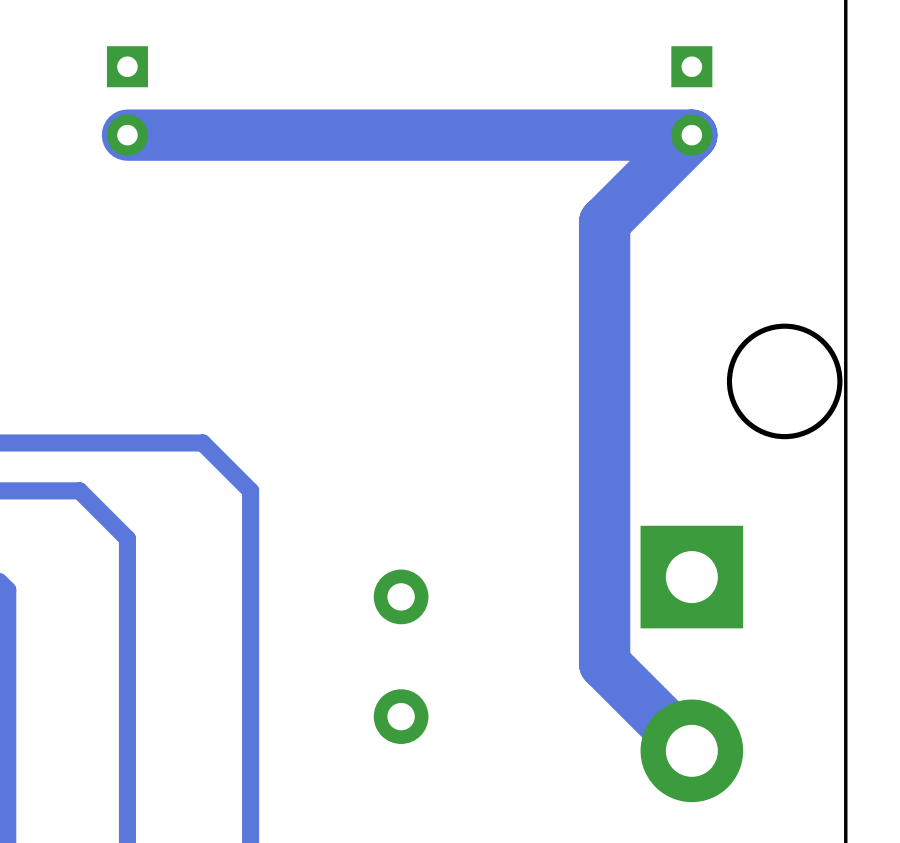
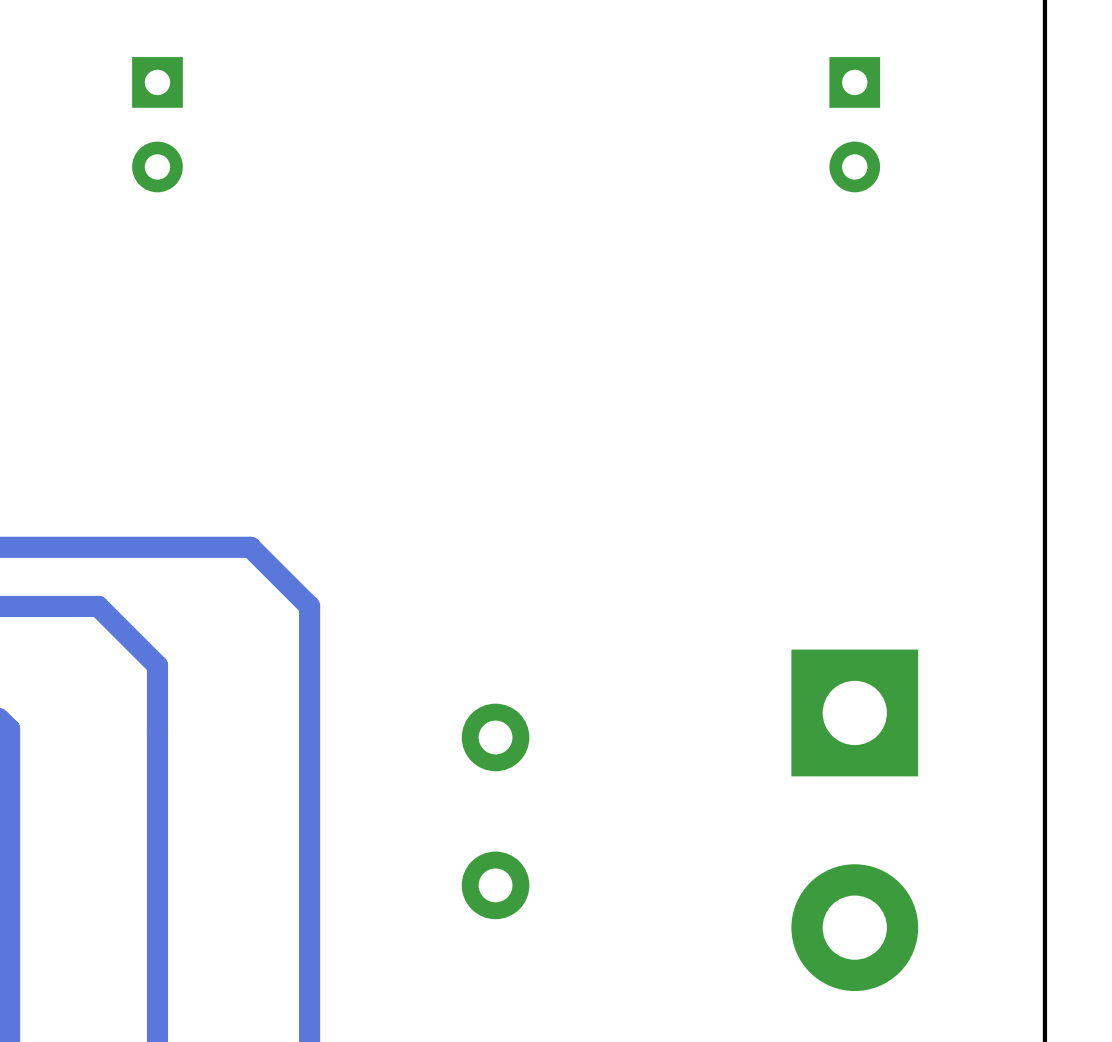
track: (127, 135) (691, 135) (604, 222) (604, 663) (691, 750) -> none
round board edge: [726, 323, 843, 440] -> none

